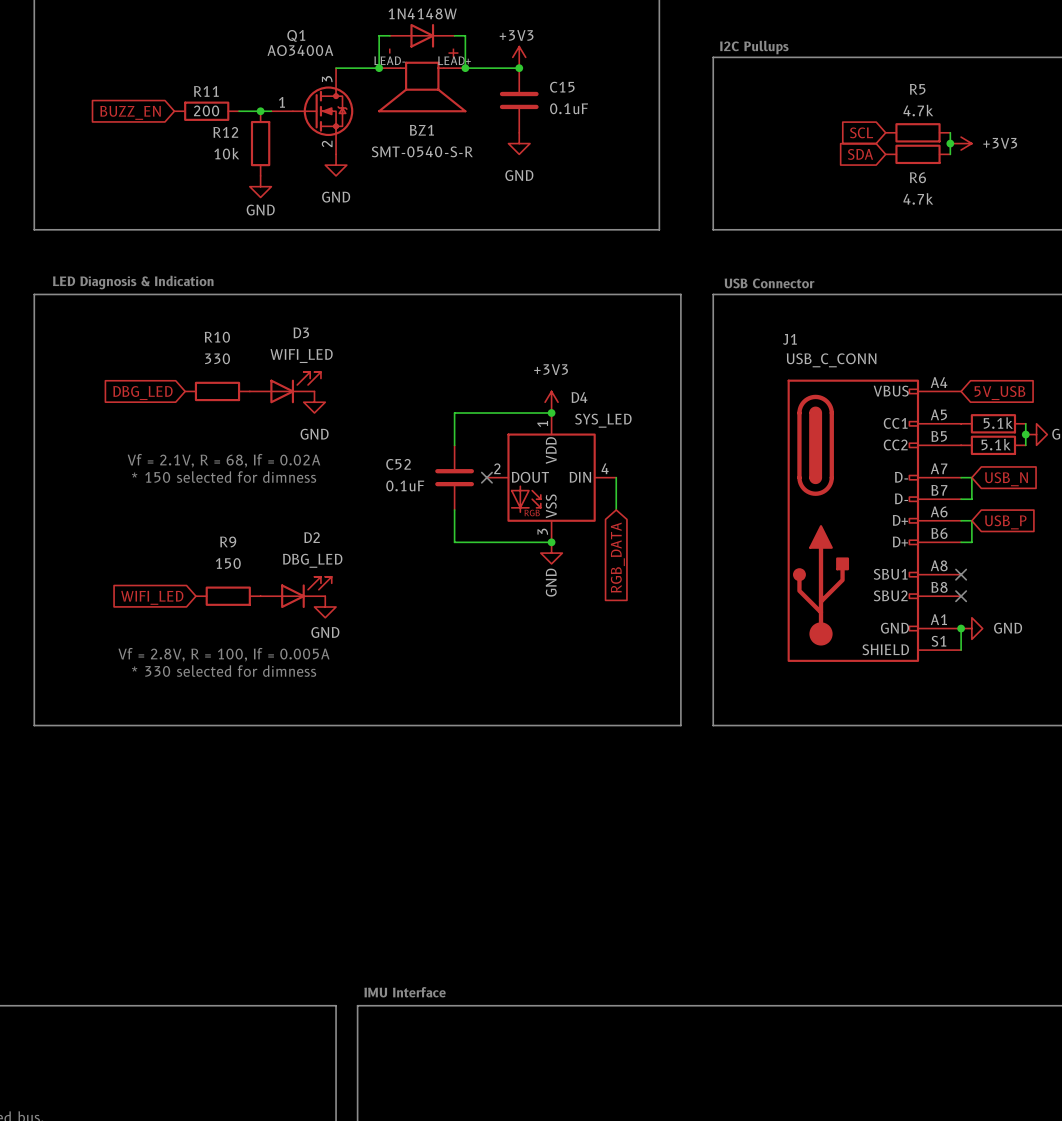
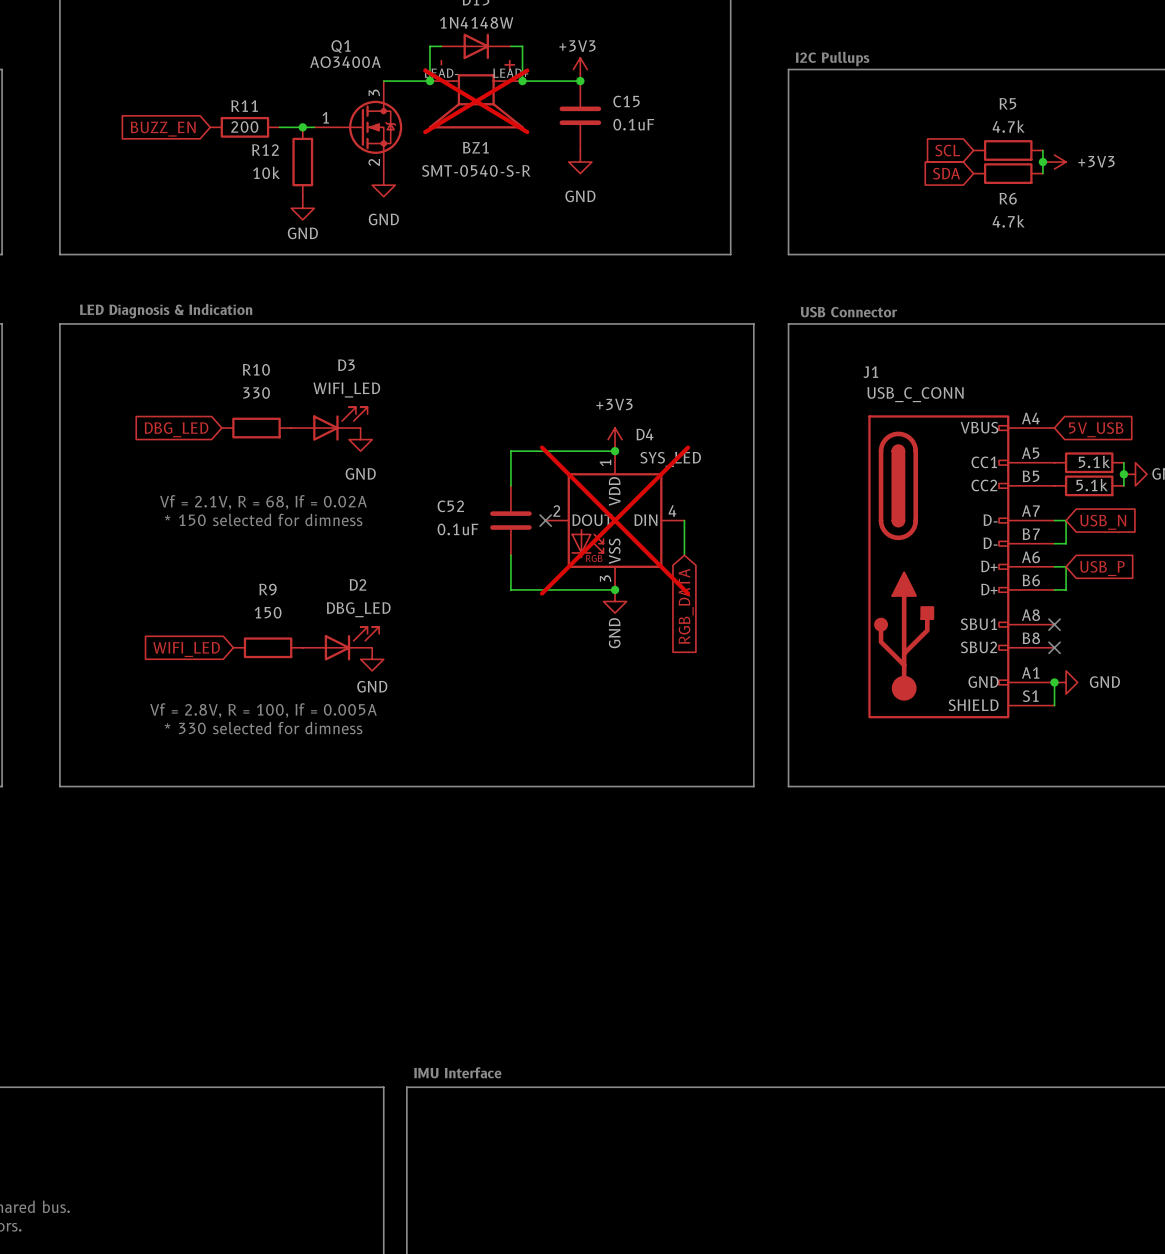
BZ1 do-not-place cross: none -> (476, 101)
D4 do-not-place cross: none -> (615, 520)

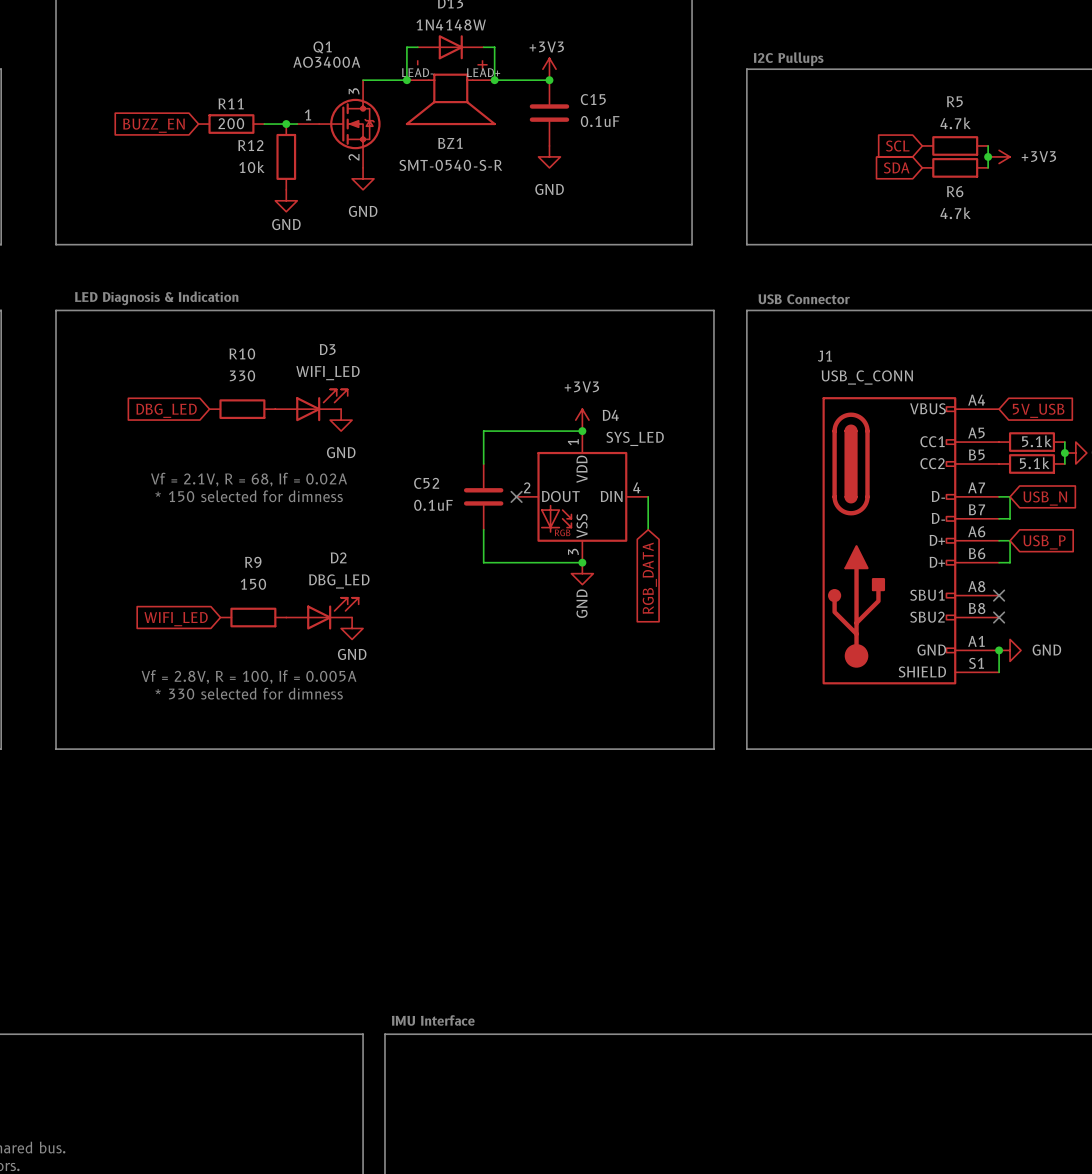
BZ1 do-not-place cross: (476, 101) -> none
D4 do-not-place cross: (615, 520) -> none

